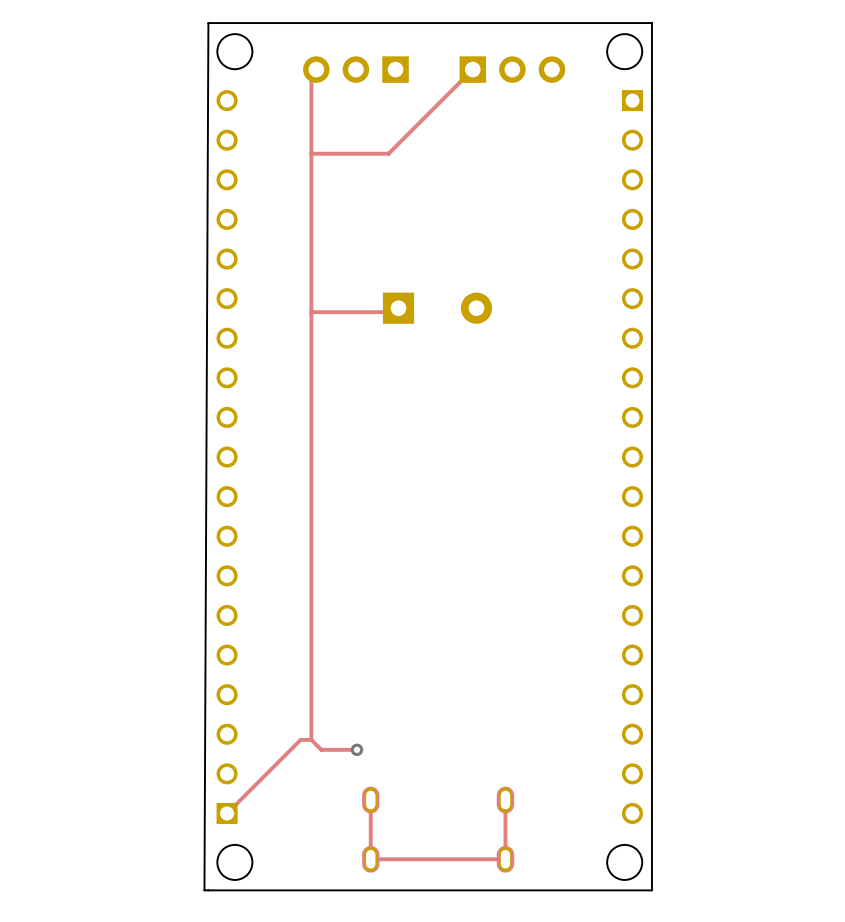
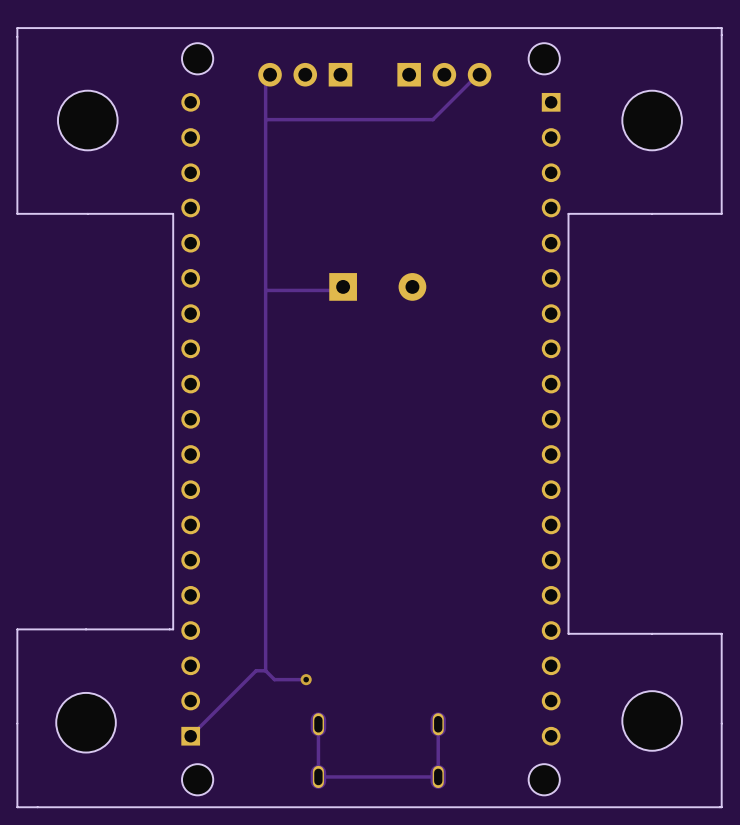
track: (472, 69) (388, 153) (311, 153) -> none
track: none -> (476, 75) (432, 119) (265, 119)
part: none -> (87, 120)
part: none -> (652, 120)
board edge: (651, 226) (651, 23) (208, 23) (204, 890) (651, 890) (651, 698) -> (568, 213) (721, 213) (721, 28) (17, 28) (17, 213) (173, 213) (173, 629) (17, 629) (17, 807) (721, 807) (721, 633) (568, 633)
part: none -> (652, 720)
part: none -> (86, 722)

